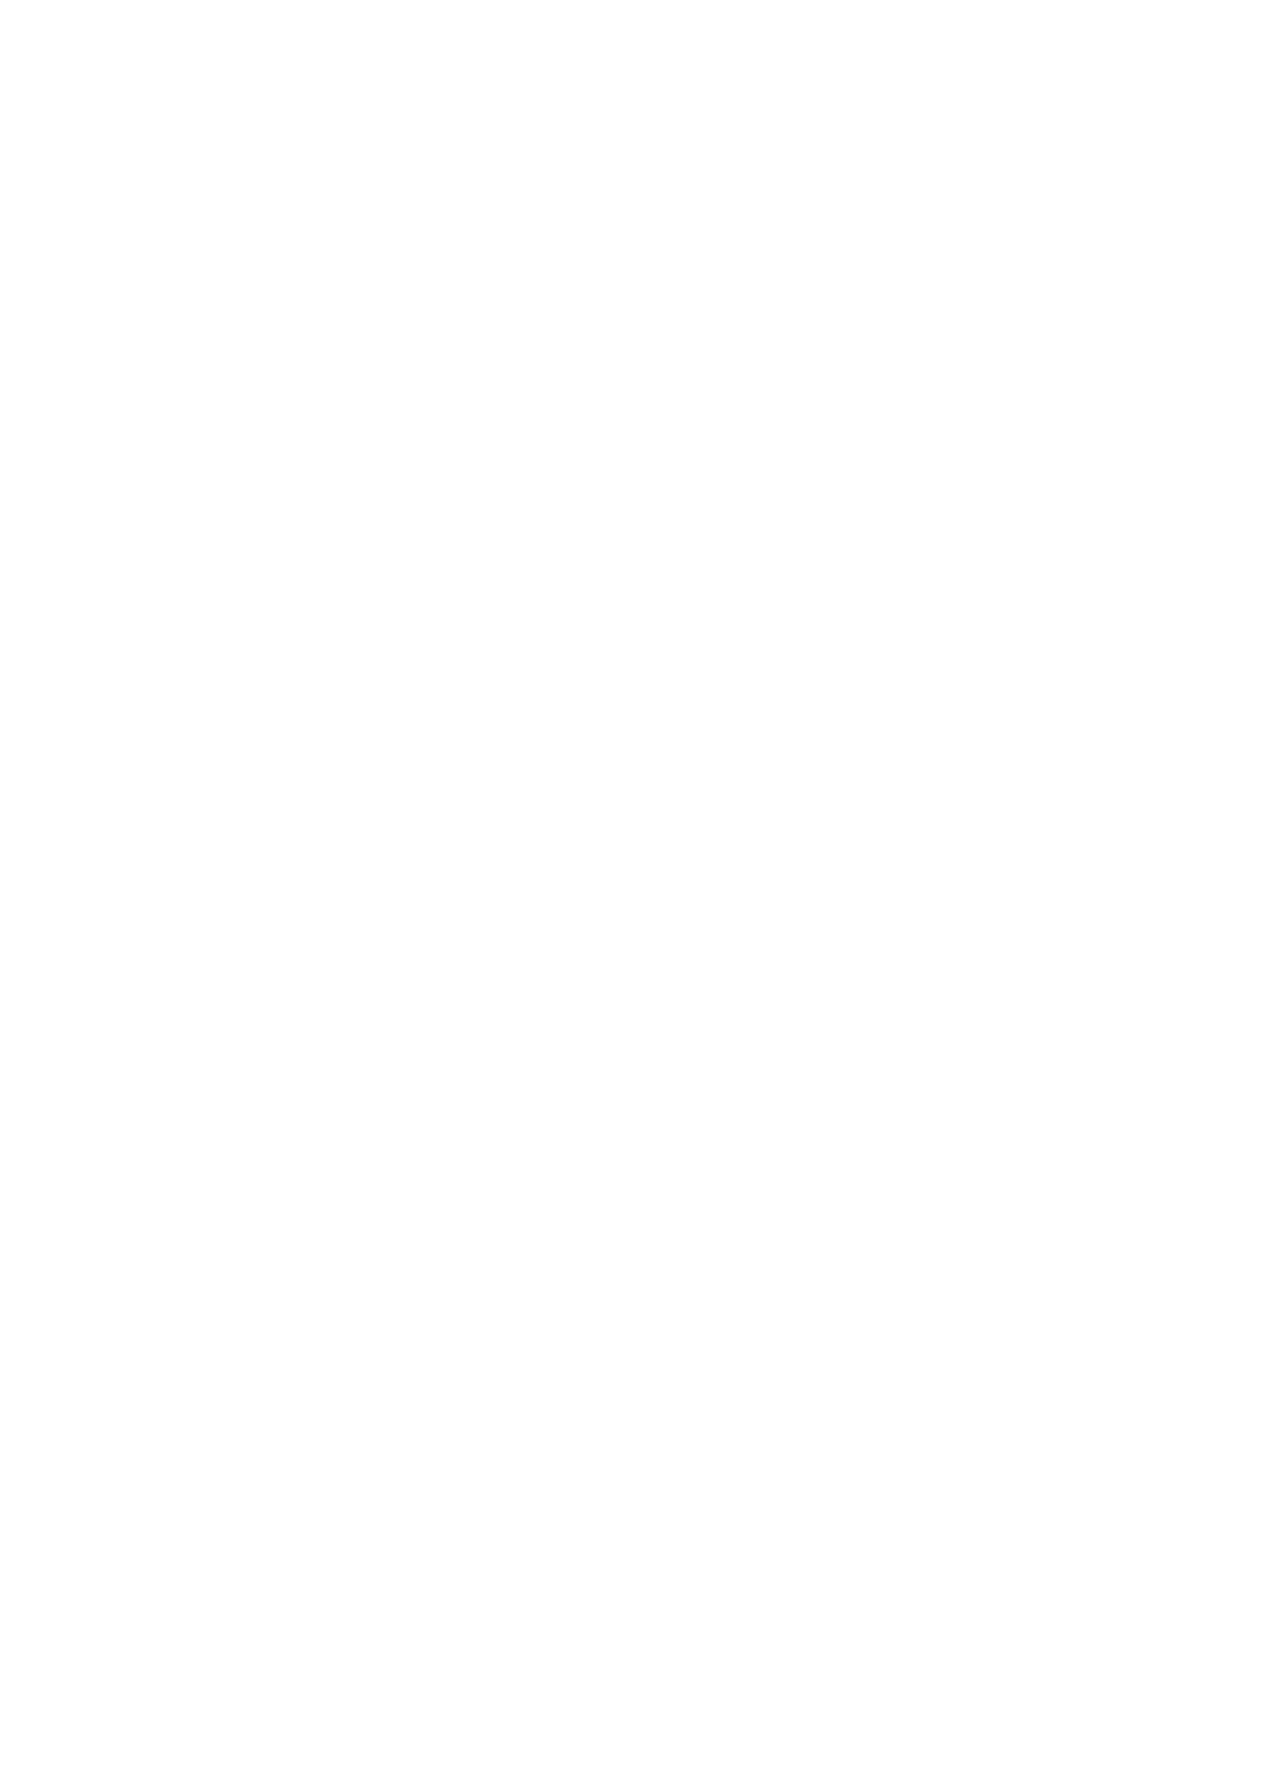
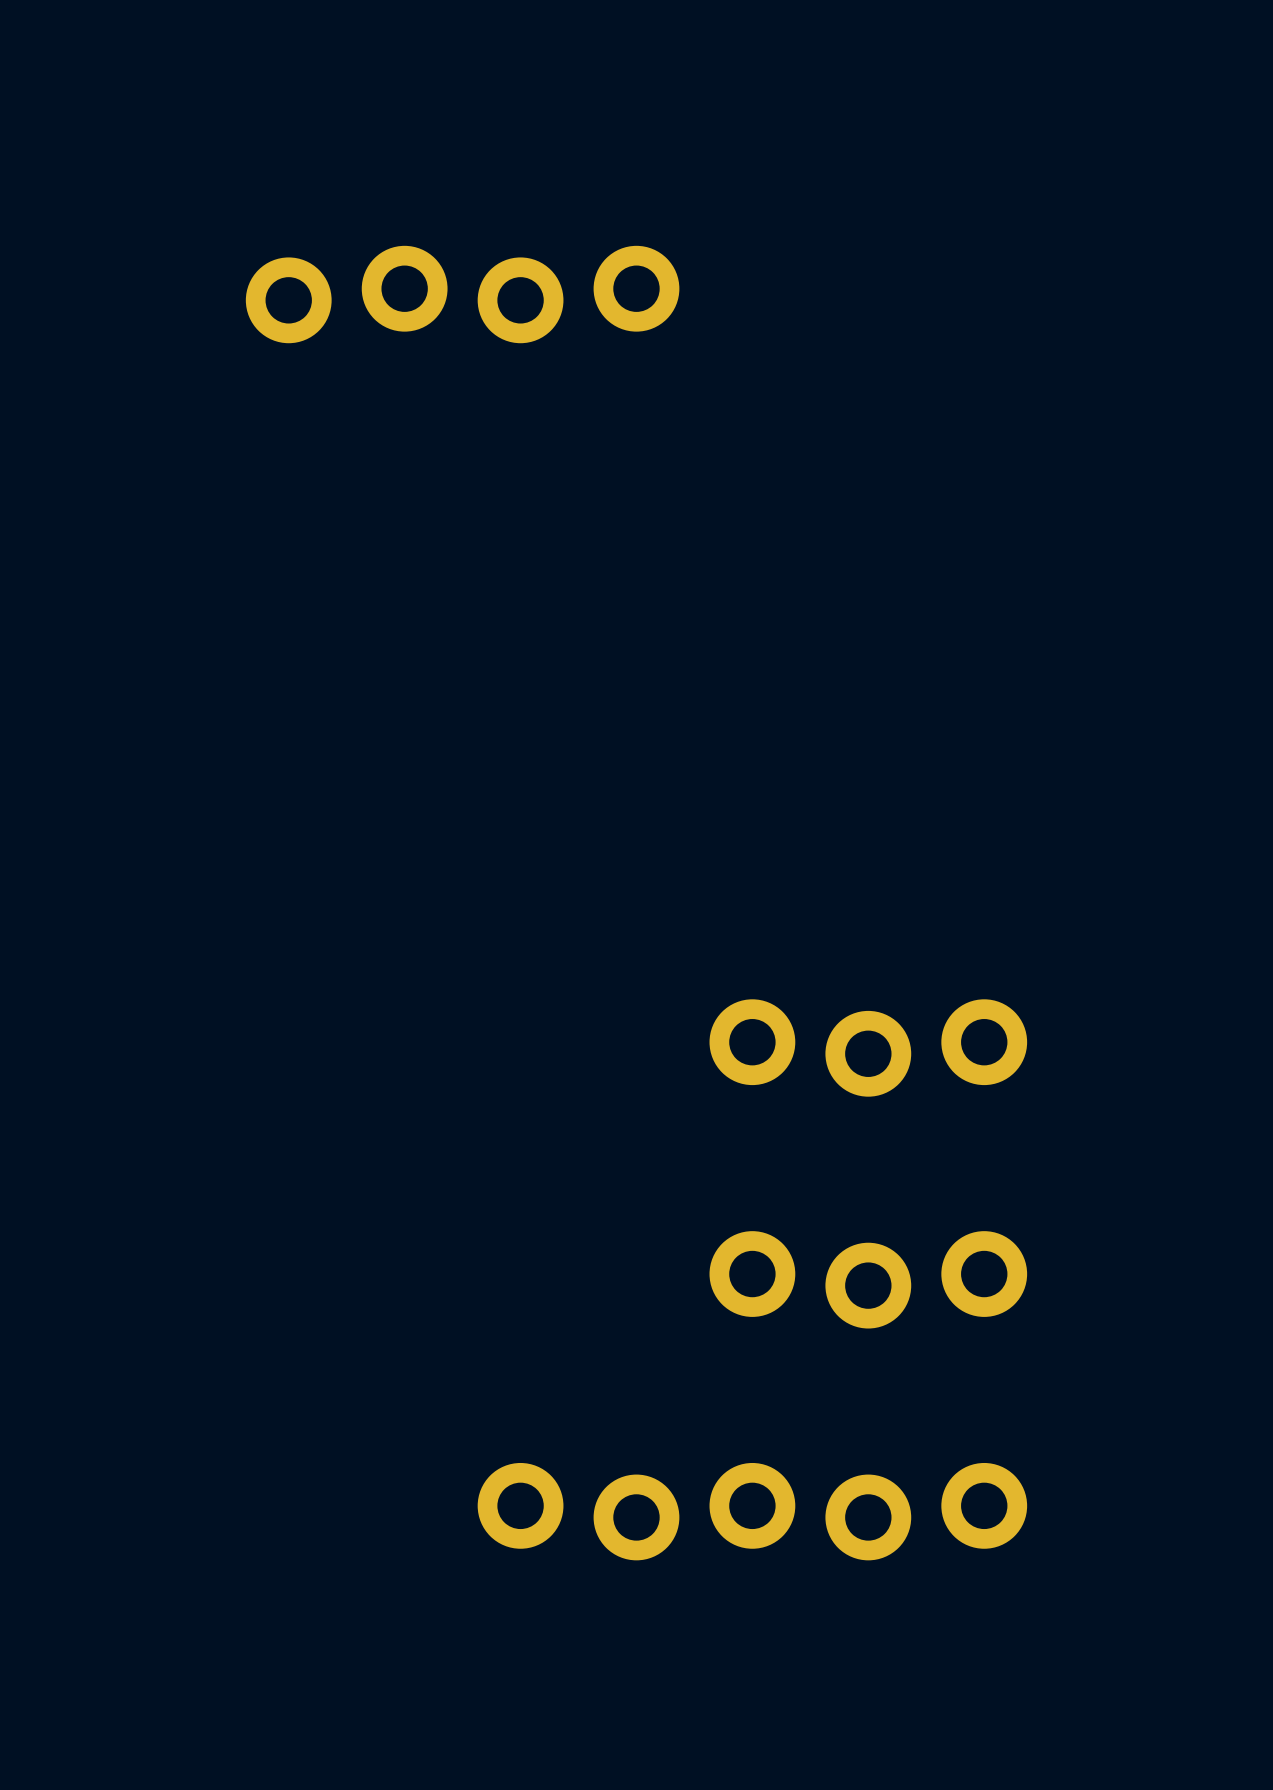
part: none -> (462, 294)
part: none -> (868, 1047)
part: none -> (868, 1279)
part: none -> (752, 1511)

